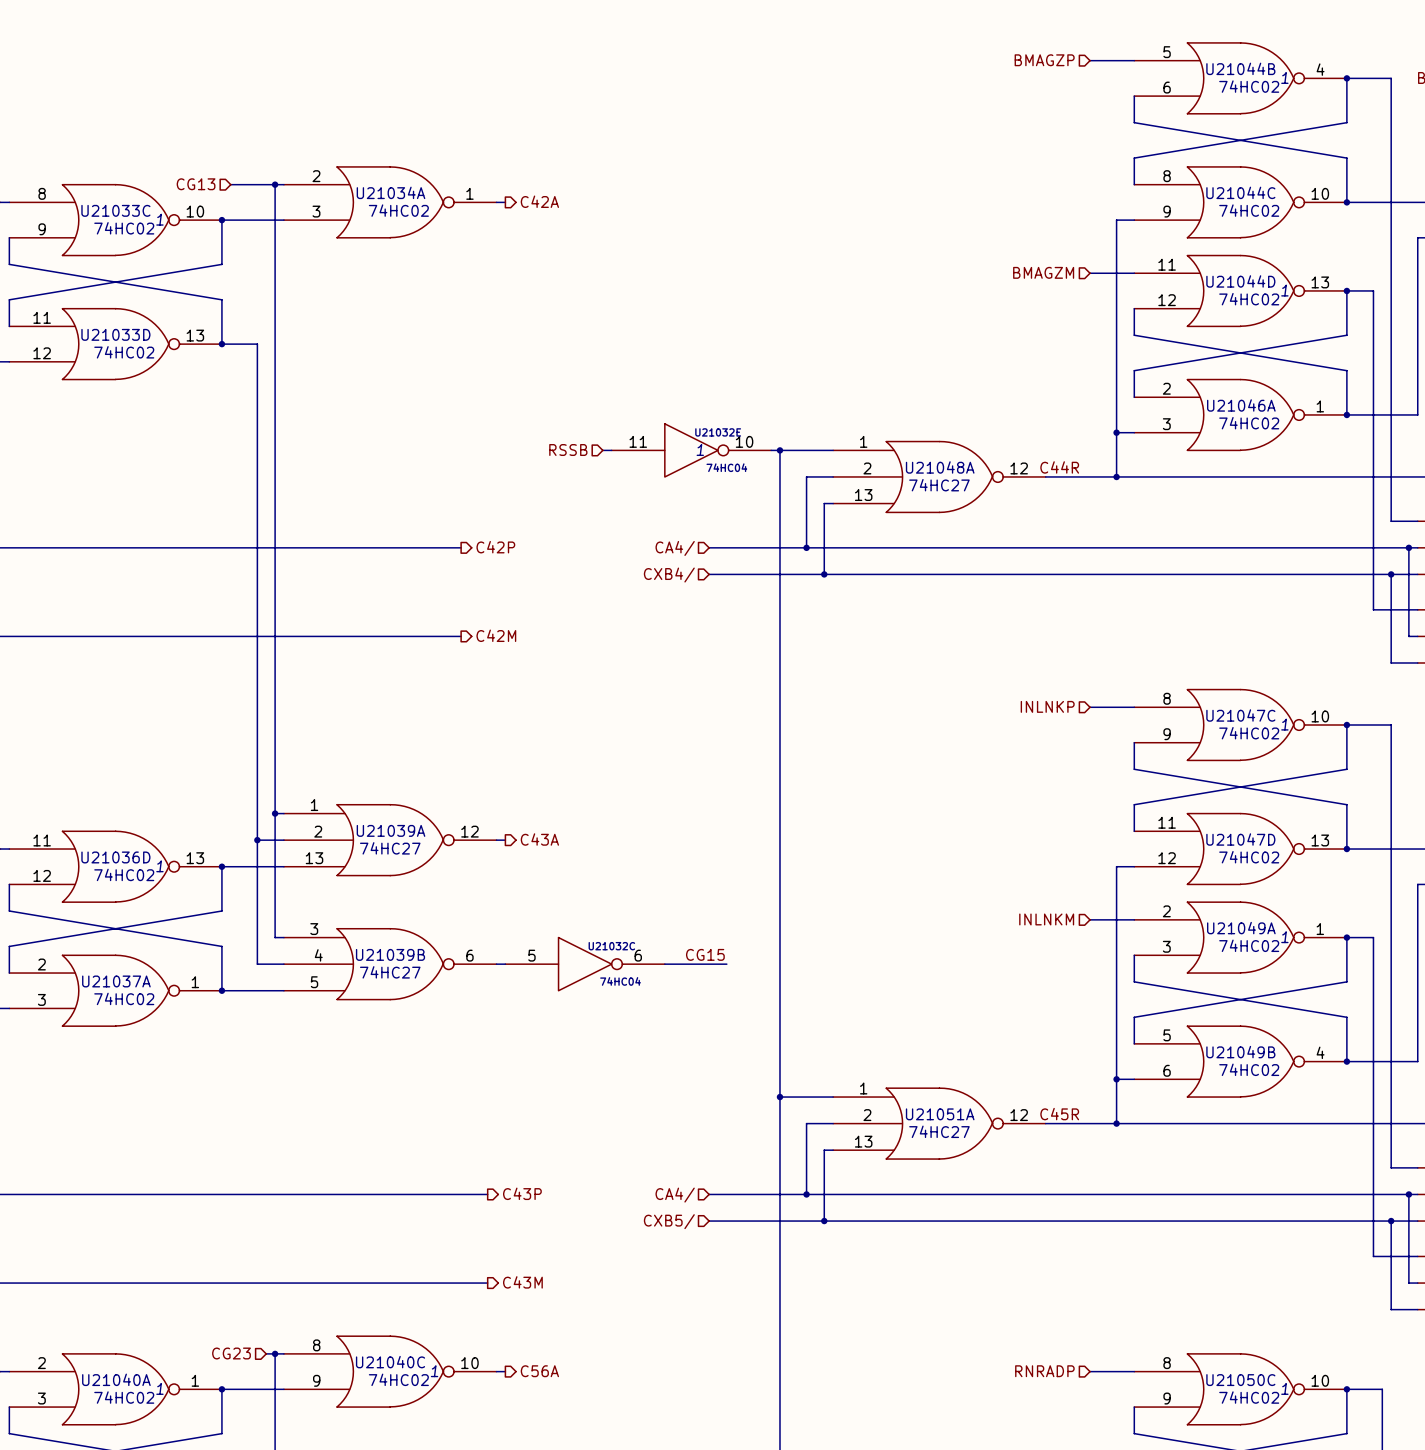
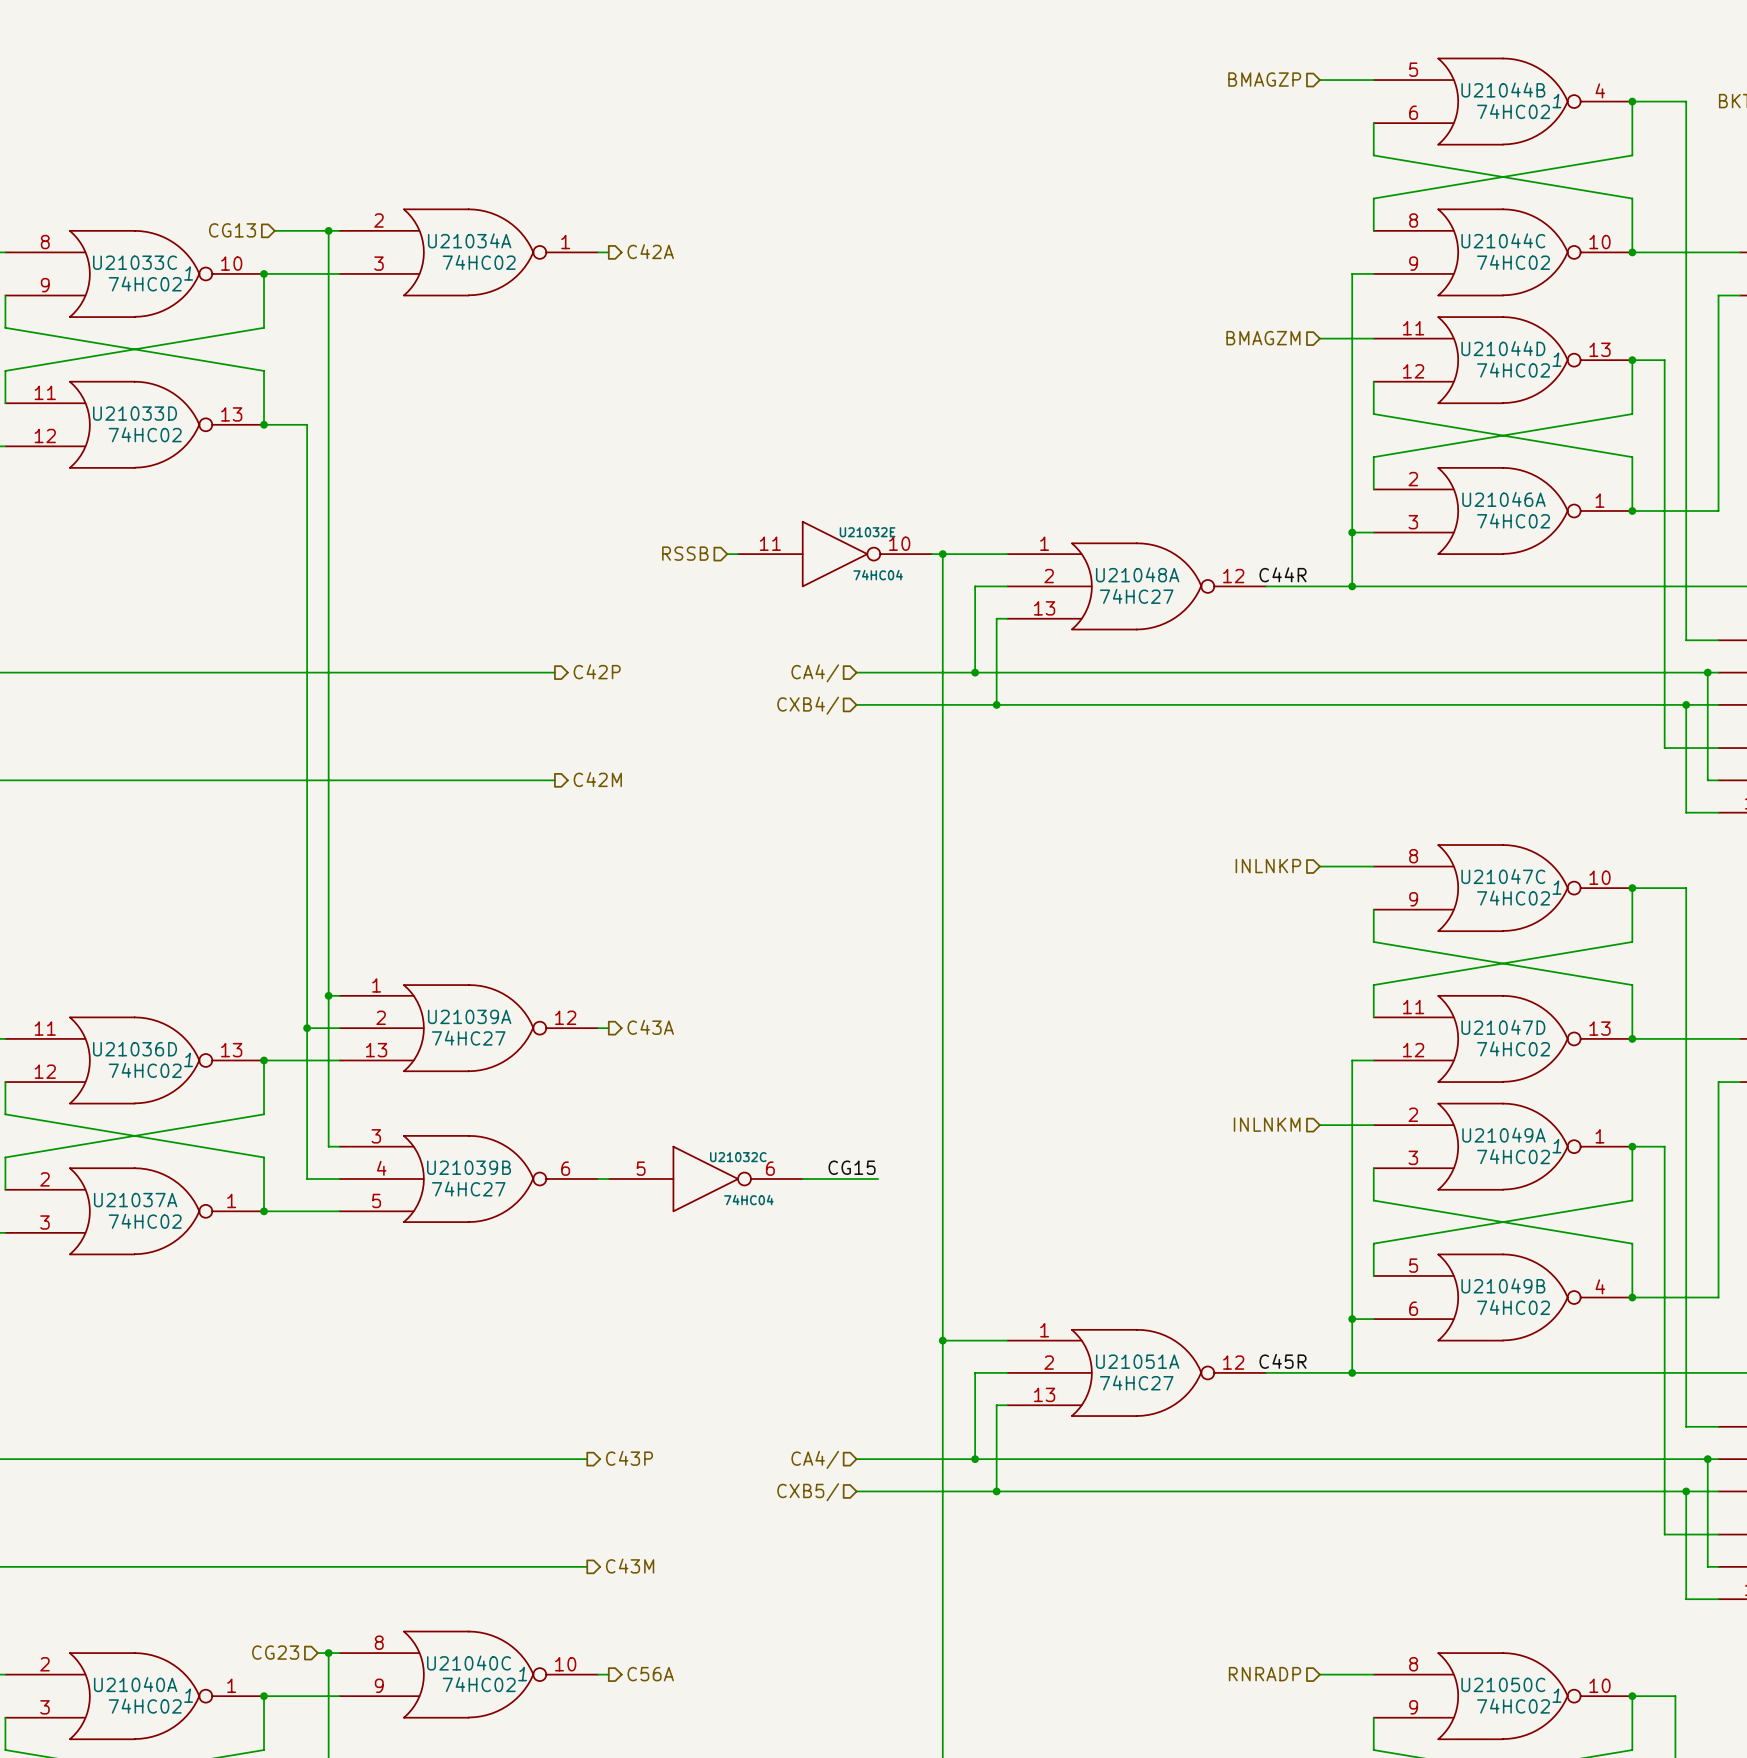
U21032E text: 1 (700, 450) -> none

